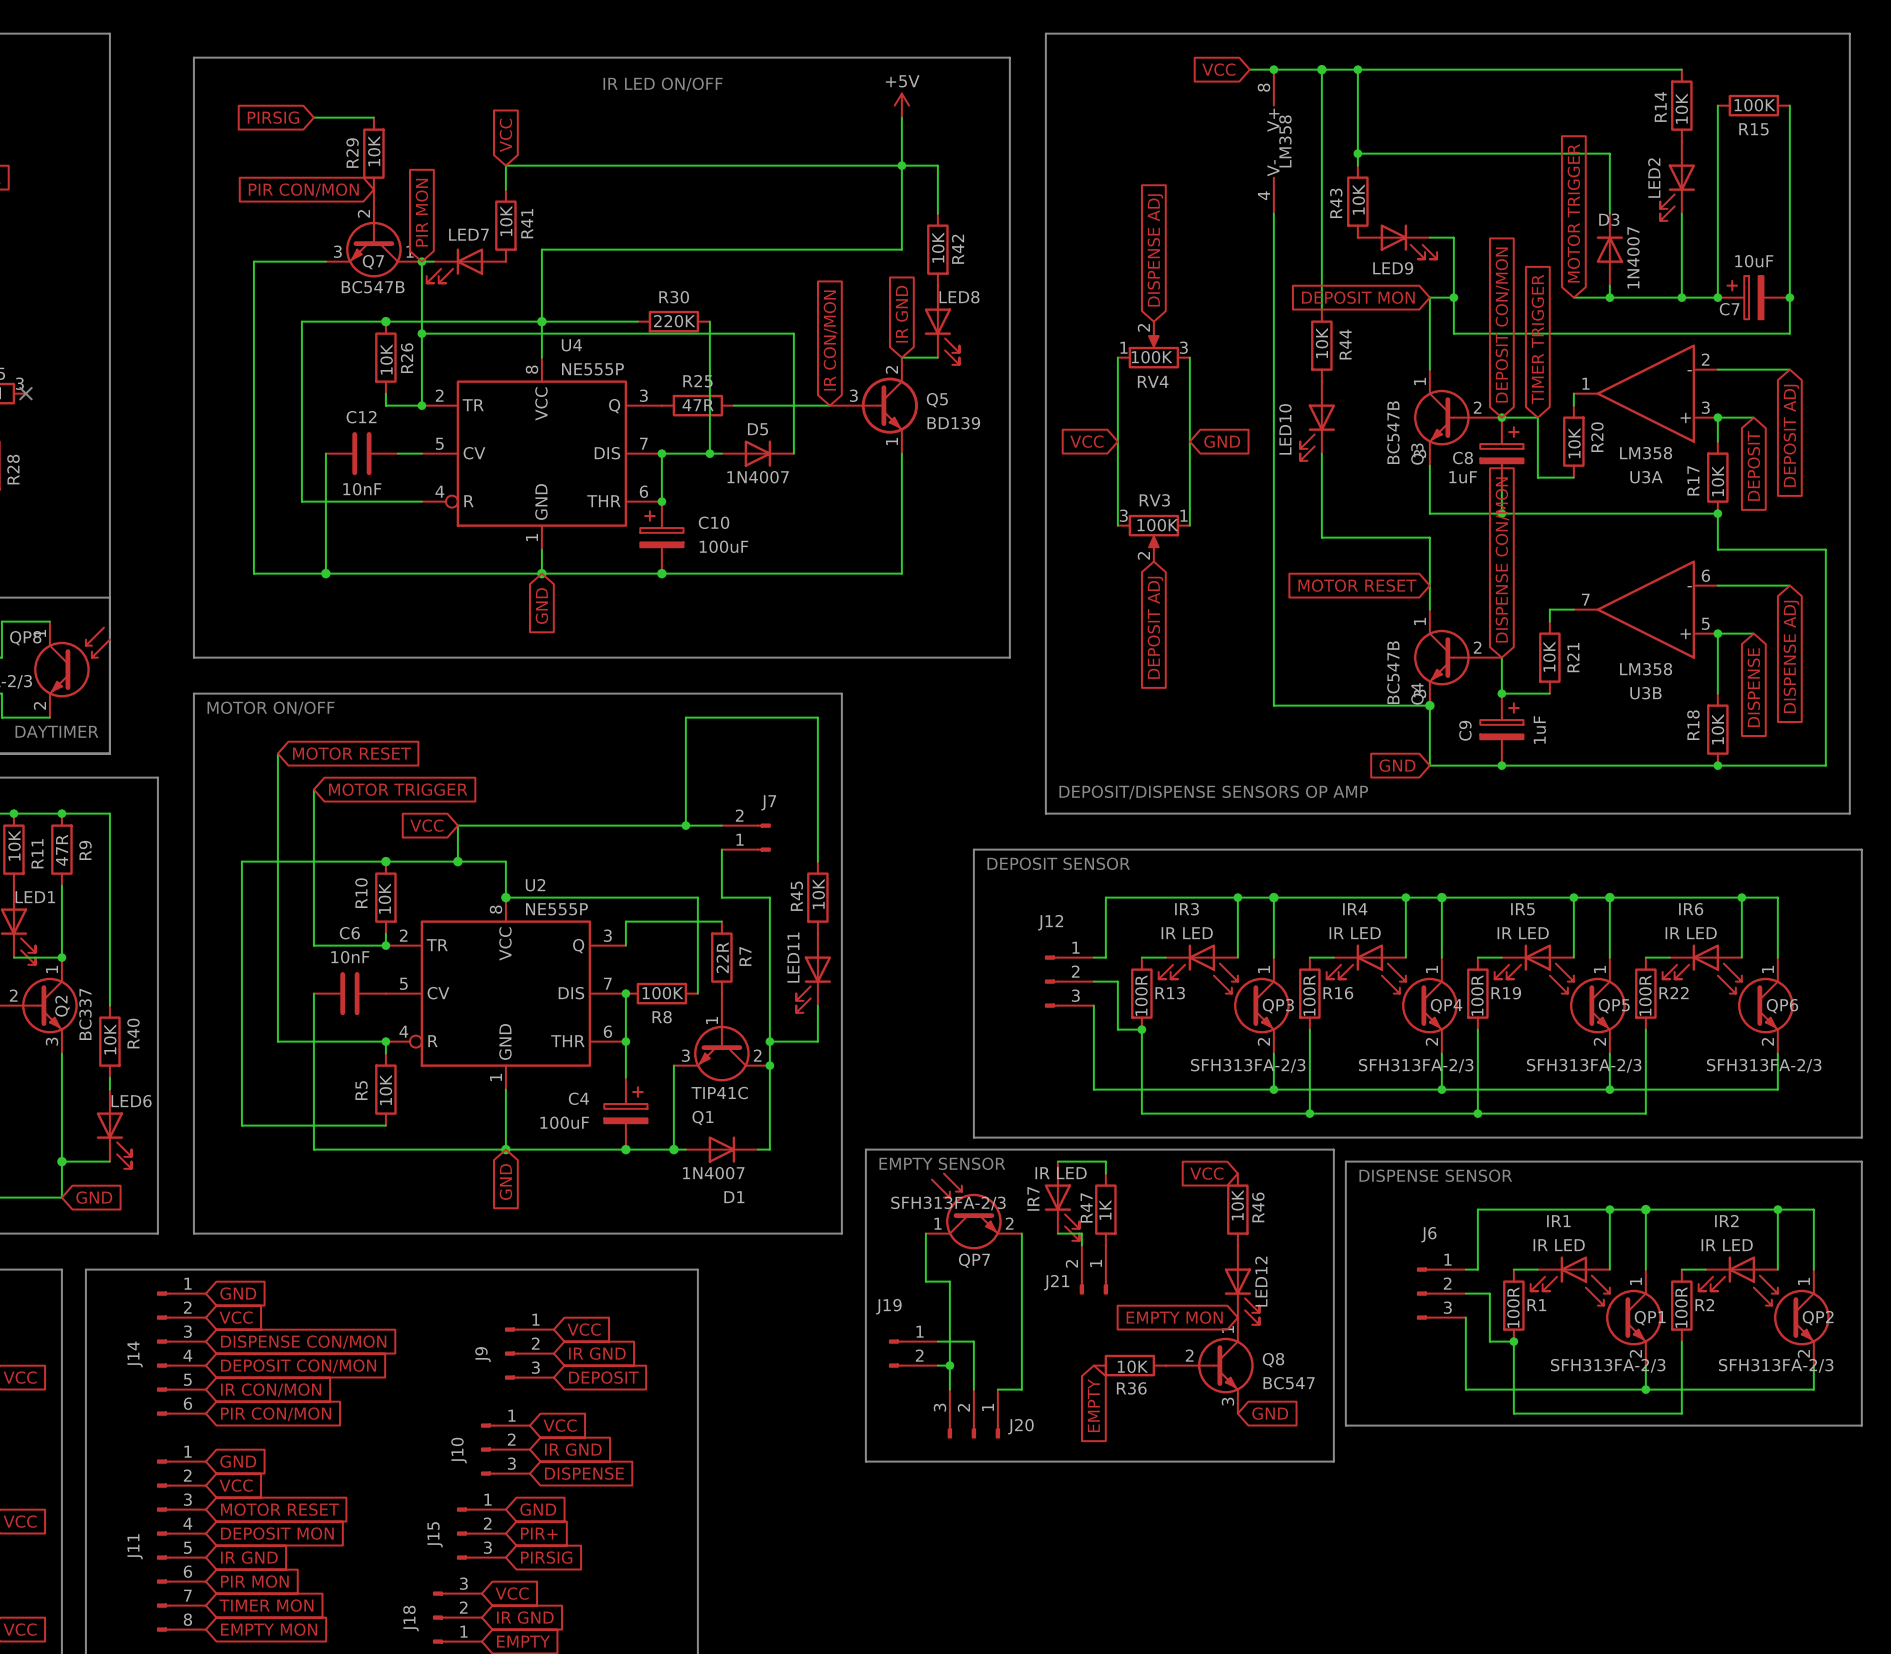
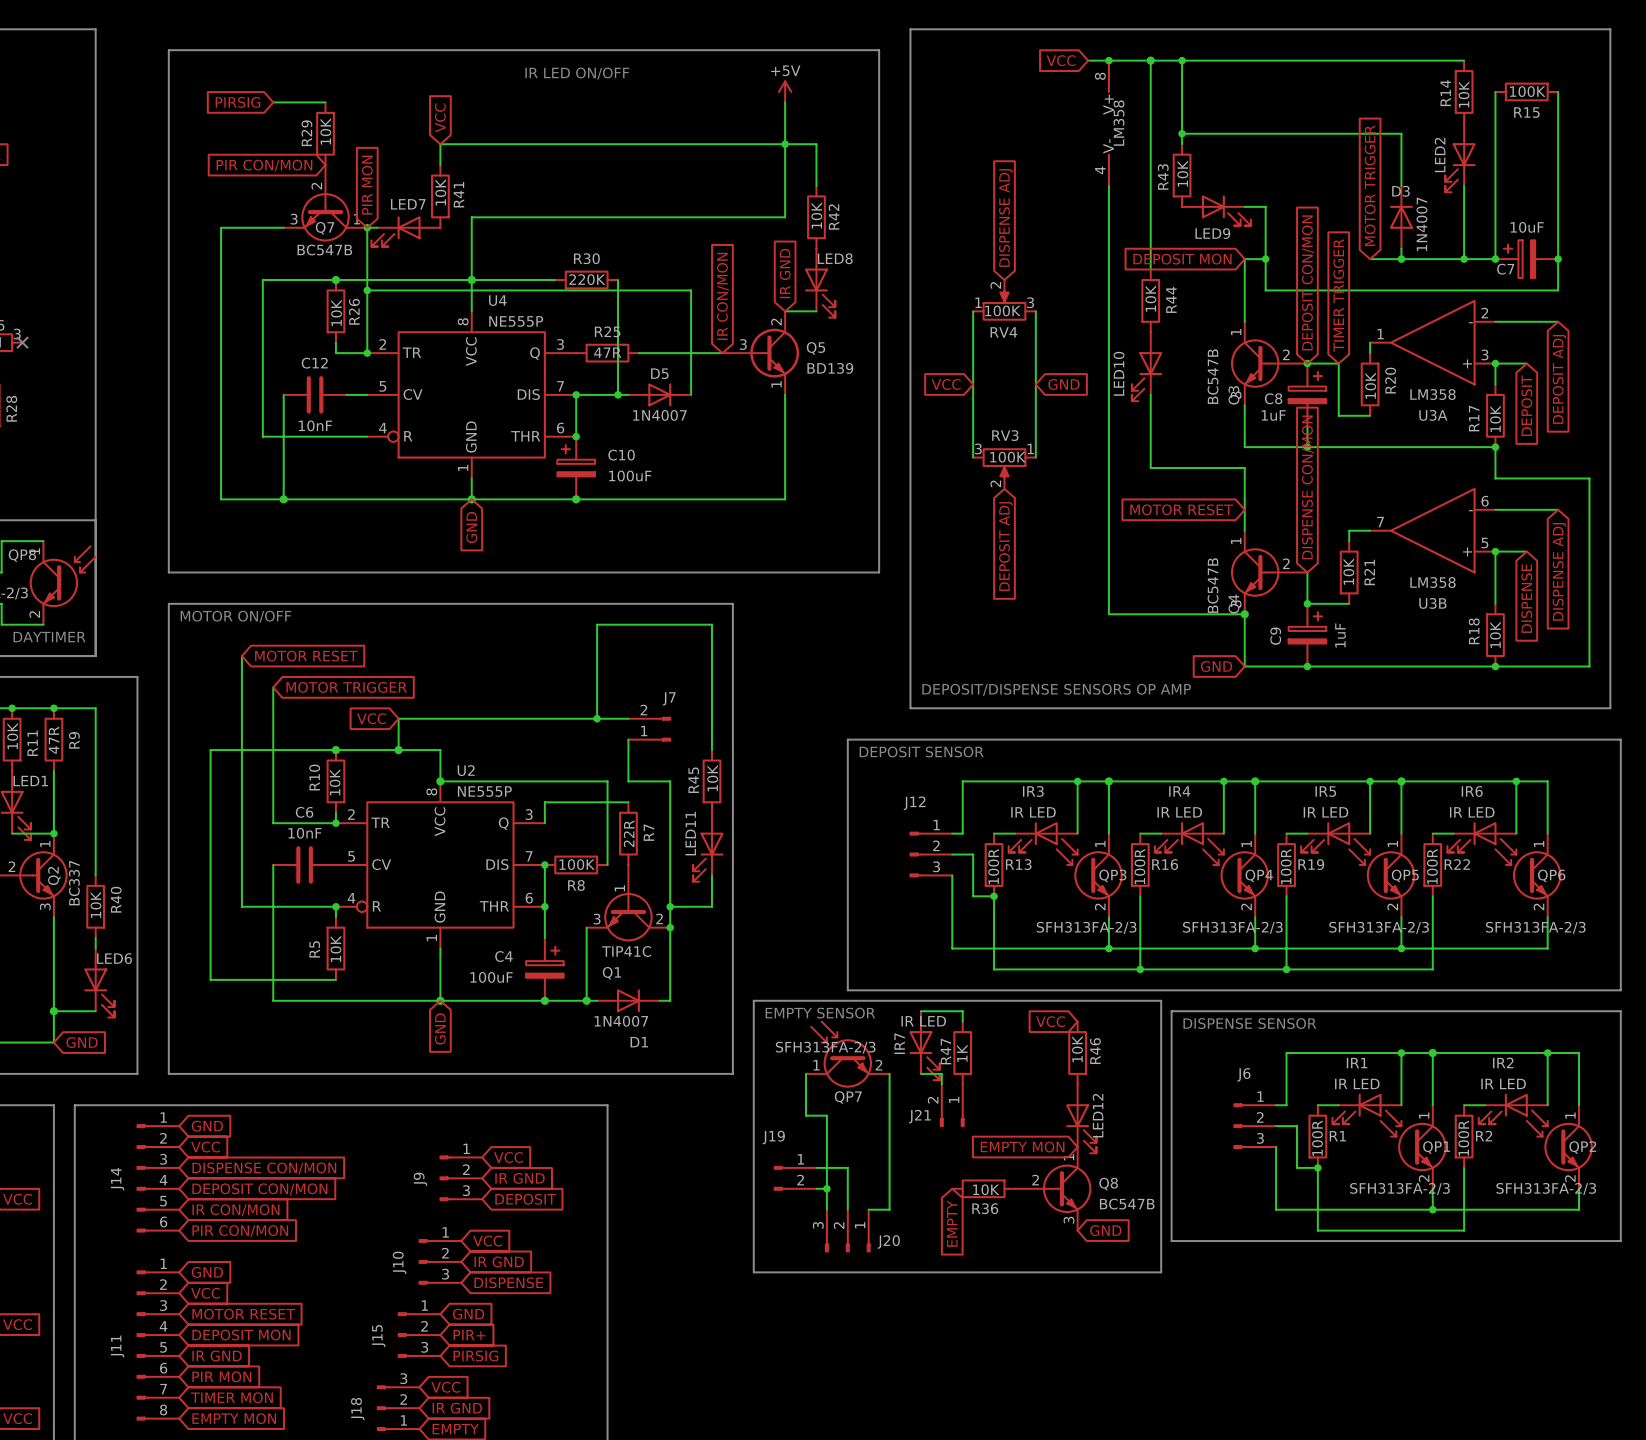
Q8 value: BC547 (1289, 1383) -> BC547B (1127, 1204)

